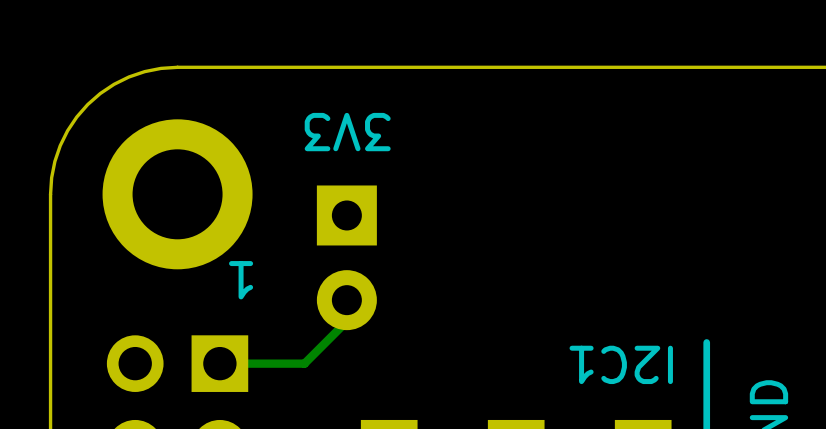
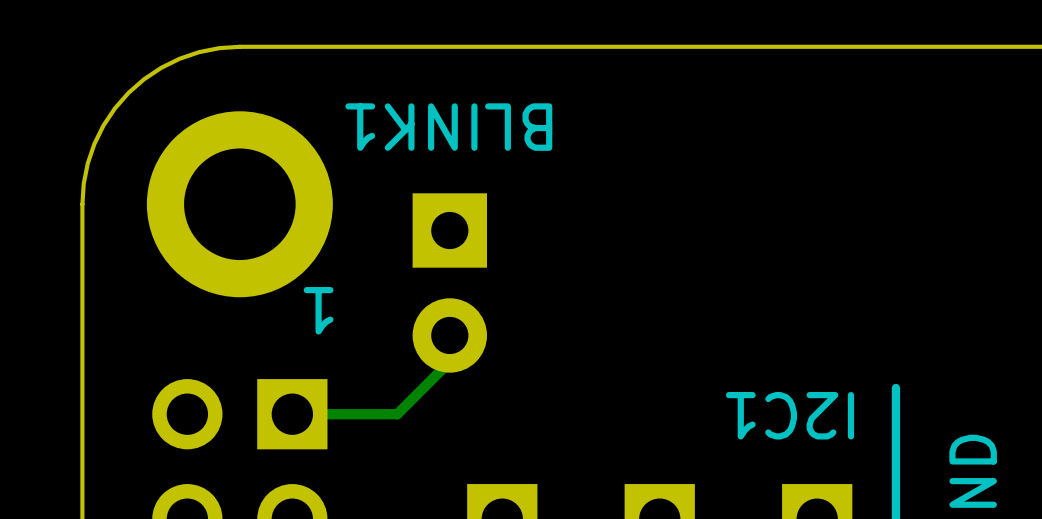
text: 3V3 (347, 132) -> BLINK1 (448, 127)

